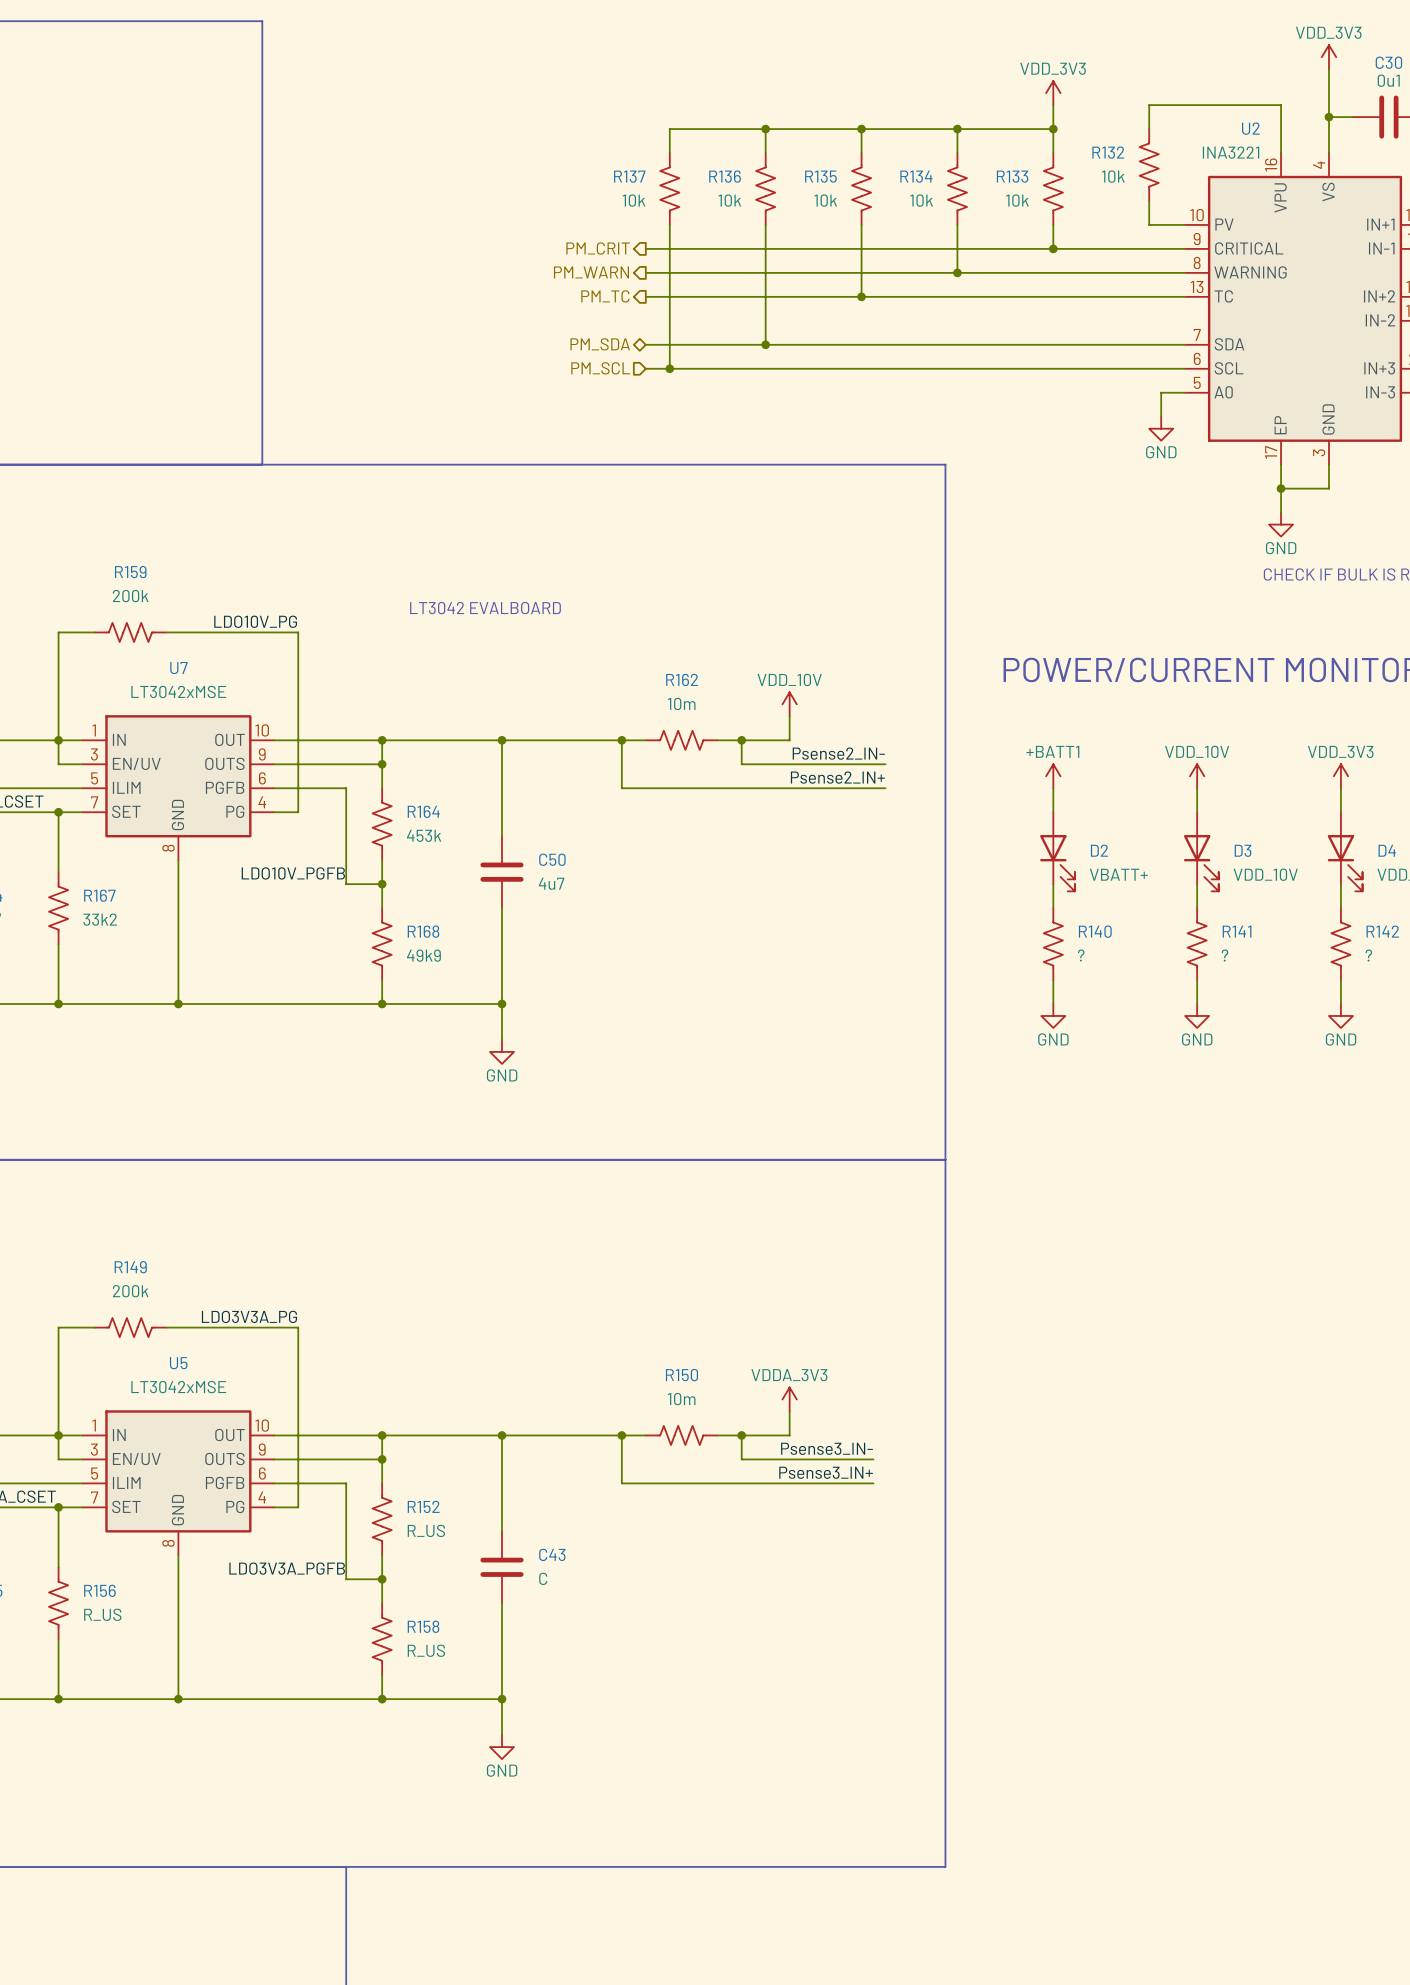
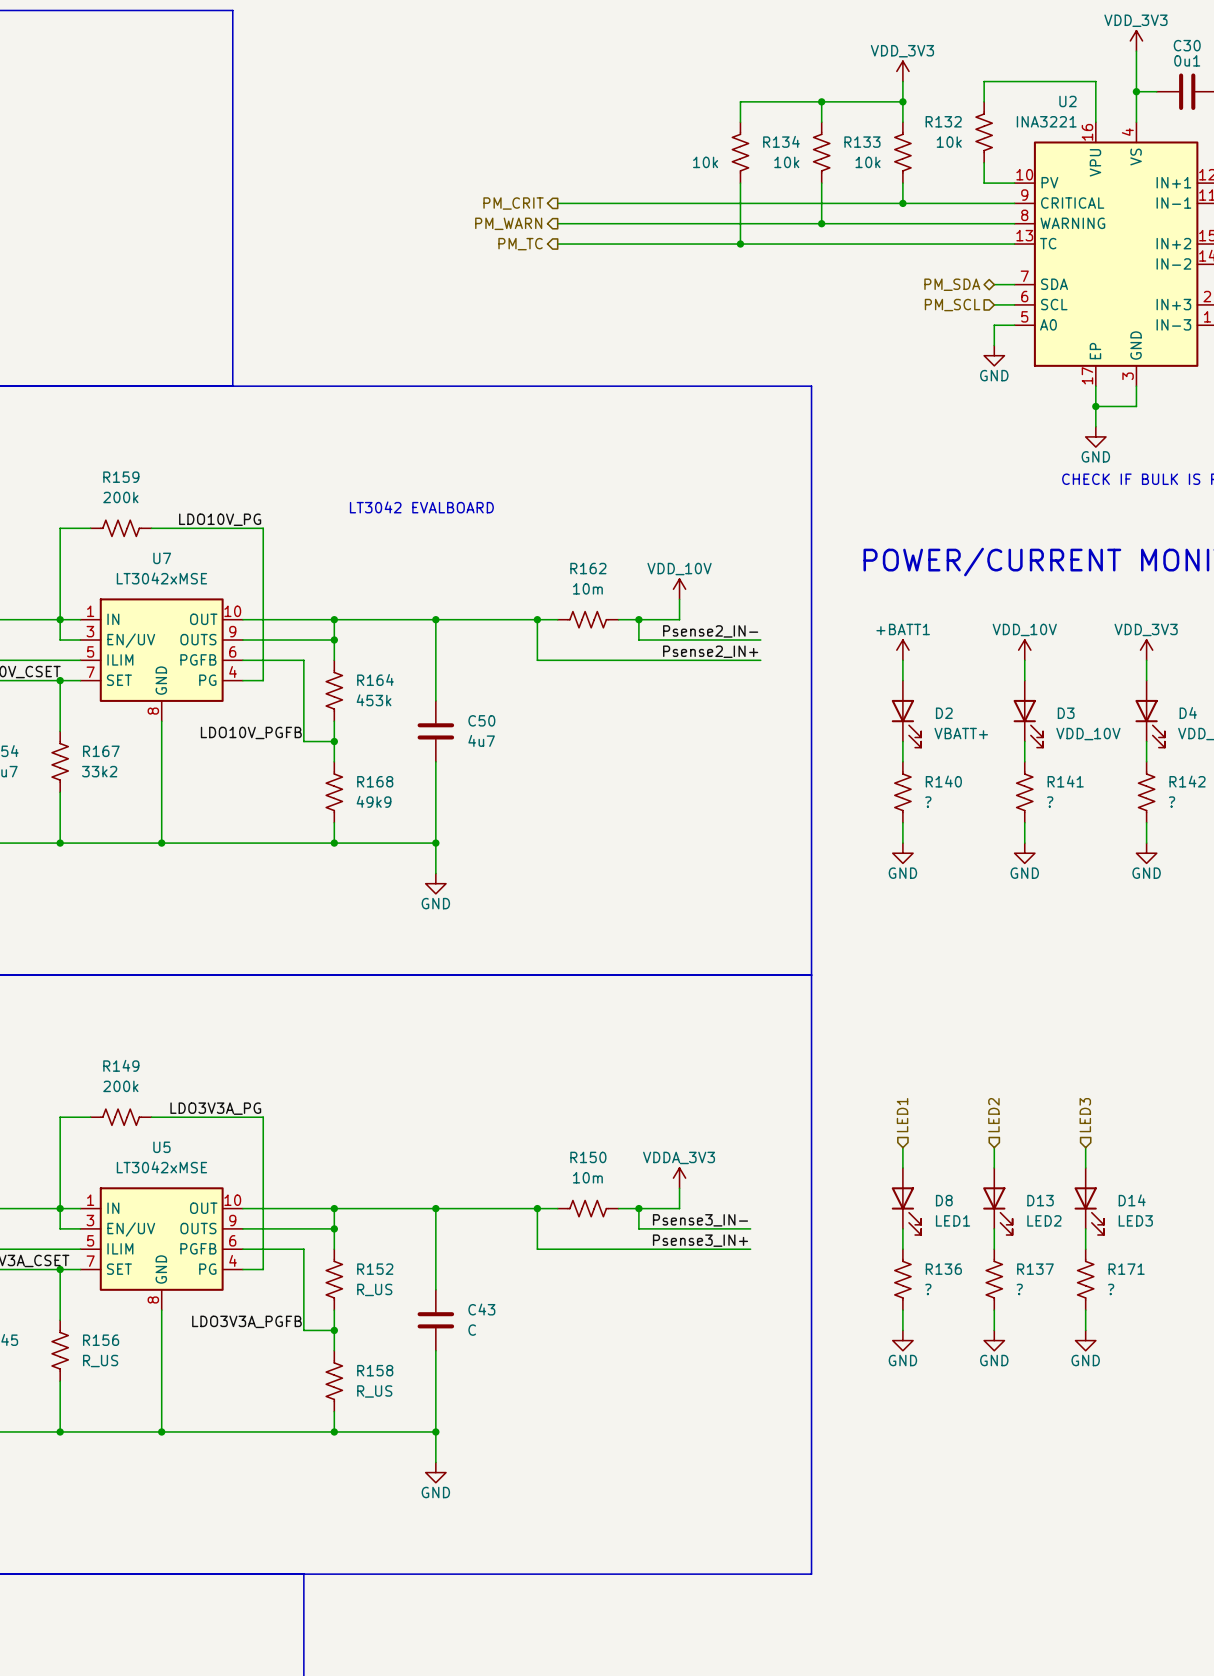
wire: (765, 129) (765, 153) -> none
junction: (765, 129) -> none
wire: (861, 129) (669, 129) (669, 153) -> none
junction: (861, 129) -> none
R135 name: R135 (820, 176) -> none
R137 flip: as is (669, 189) -> left-right (994, 1279)
R137 position: (669, 189) -> (994, 1279)
R136 flip: as is (765, 189) -> left-right (902, 1279)
R136 position: (765, 189) -> (902, 1279)
R137 value: 10k (633, 200) -> ? (1019, 1289)
R136 value: 10k (729, 200) -> ? (928, 1289)
wire: (669, 224) (669, 368) -> none
wire: (765, 224) (765, 344) -> none
hierarchical label: PM_SDA (600, 344) -> none
wire: (645, 344) (1161, 344) -> none
junction: (765, 344) -> none
hierarchical label: none -> PM_SDA (952, 284)
hierarchical label: PM_SCL (600, 368) -> none
wire: (645, 368) (1161, 368) -> none
junction: (669, 368) -> none
hierarchical label: none -> PM_SCL (952, 305)
hierarchical label: none -> LED2 (993, 1115)
hierarchical label: none -> LED3 (1085, 1115)
hierarchical label: none -> LED1 (902, 1115)
wire: none -> (902, 1147) (902, 1167)
wire: none -> (994, 1147) (994, 1167)
wire: none -> (1085, 1147) (1085, 1167)
D8: none -> LED1 (906, 1201)
D13: none -> LED2 (997, 1201)
D14: none -> LED3 (1089, 1201)
wire: none -> (902, 1228) (902, 1249)
wire: none -> (994, 1228) (994, 1249)
wire: none -> (1085, 1228) (1085, 1249)
R171: none -> ? (1085, 1279)
wire: none -> (902, 1310) (902, 1330)
wire: none -> (994, 1310) (994, 1330)
wire: none -> (1085, 1310) (1085, 1330)
power symbol: none -> GND (902, 1340)
power symbol: none -> GND (994, 1340)
power symbol: none -> GND (1085, 1340)

